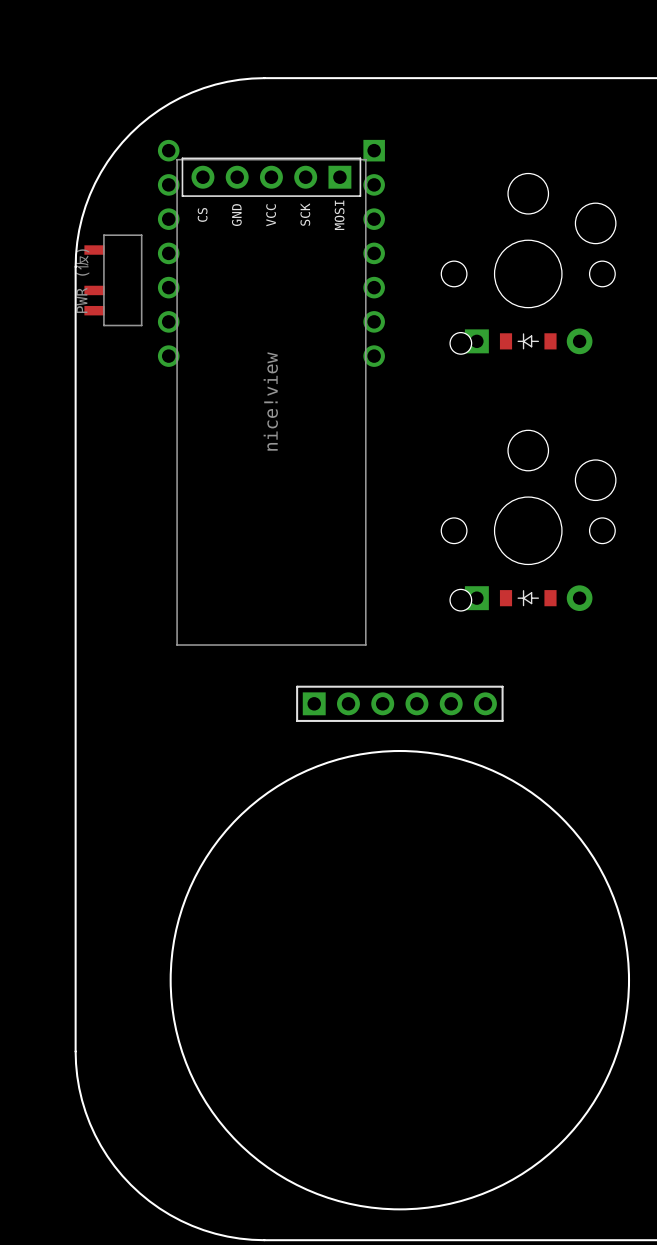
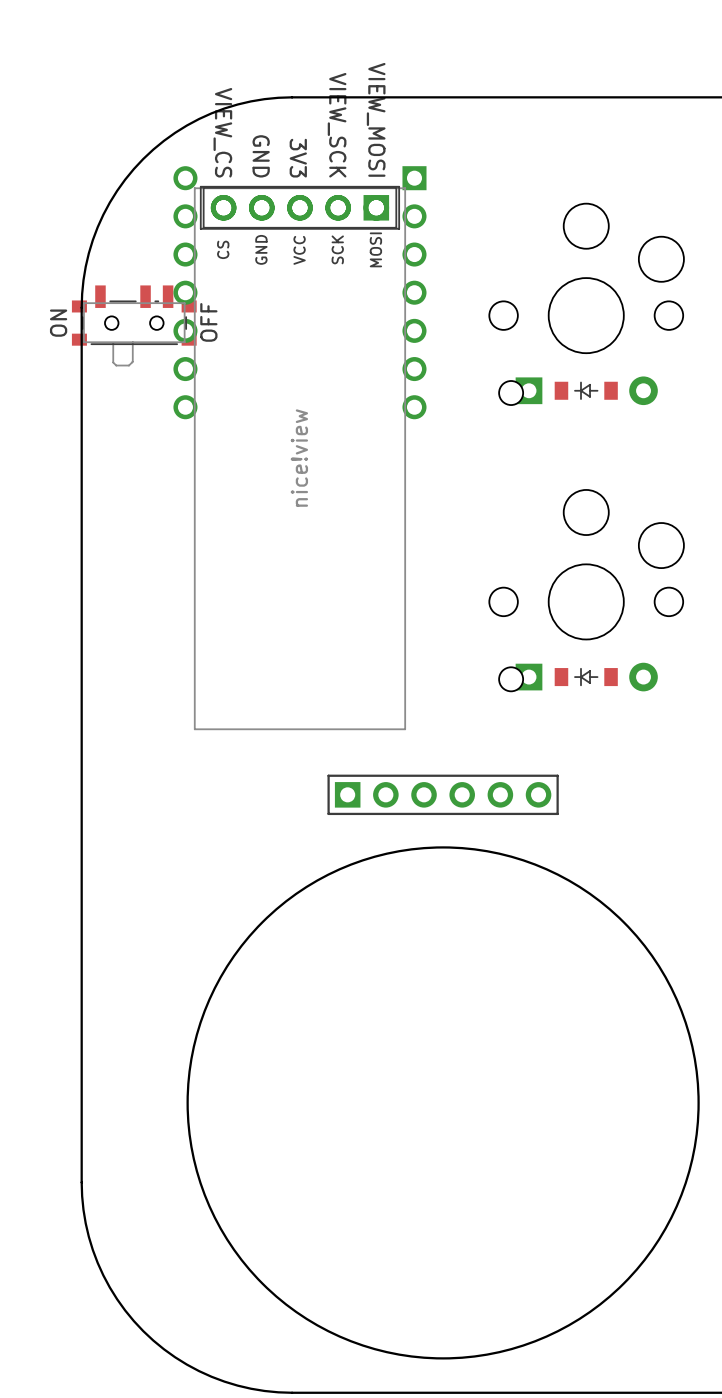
part: none -> (299, 207)
part footprint: [84, 234, 143, 327] -> [71, 285, 197, 367]

